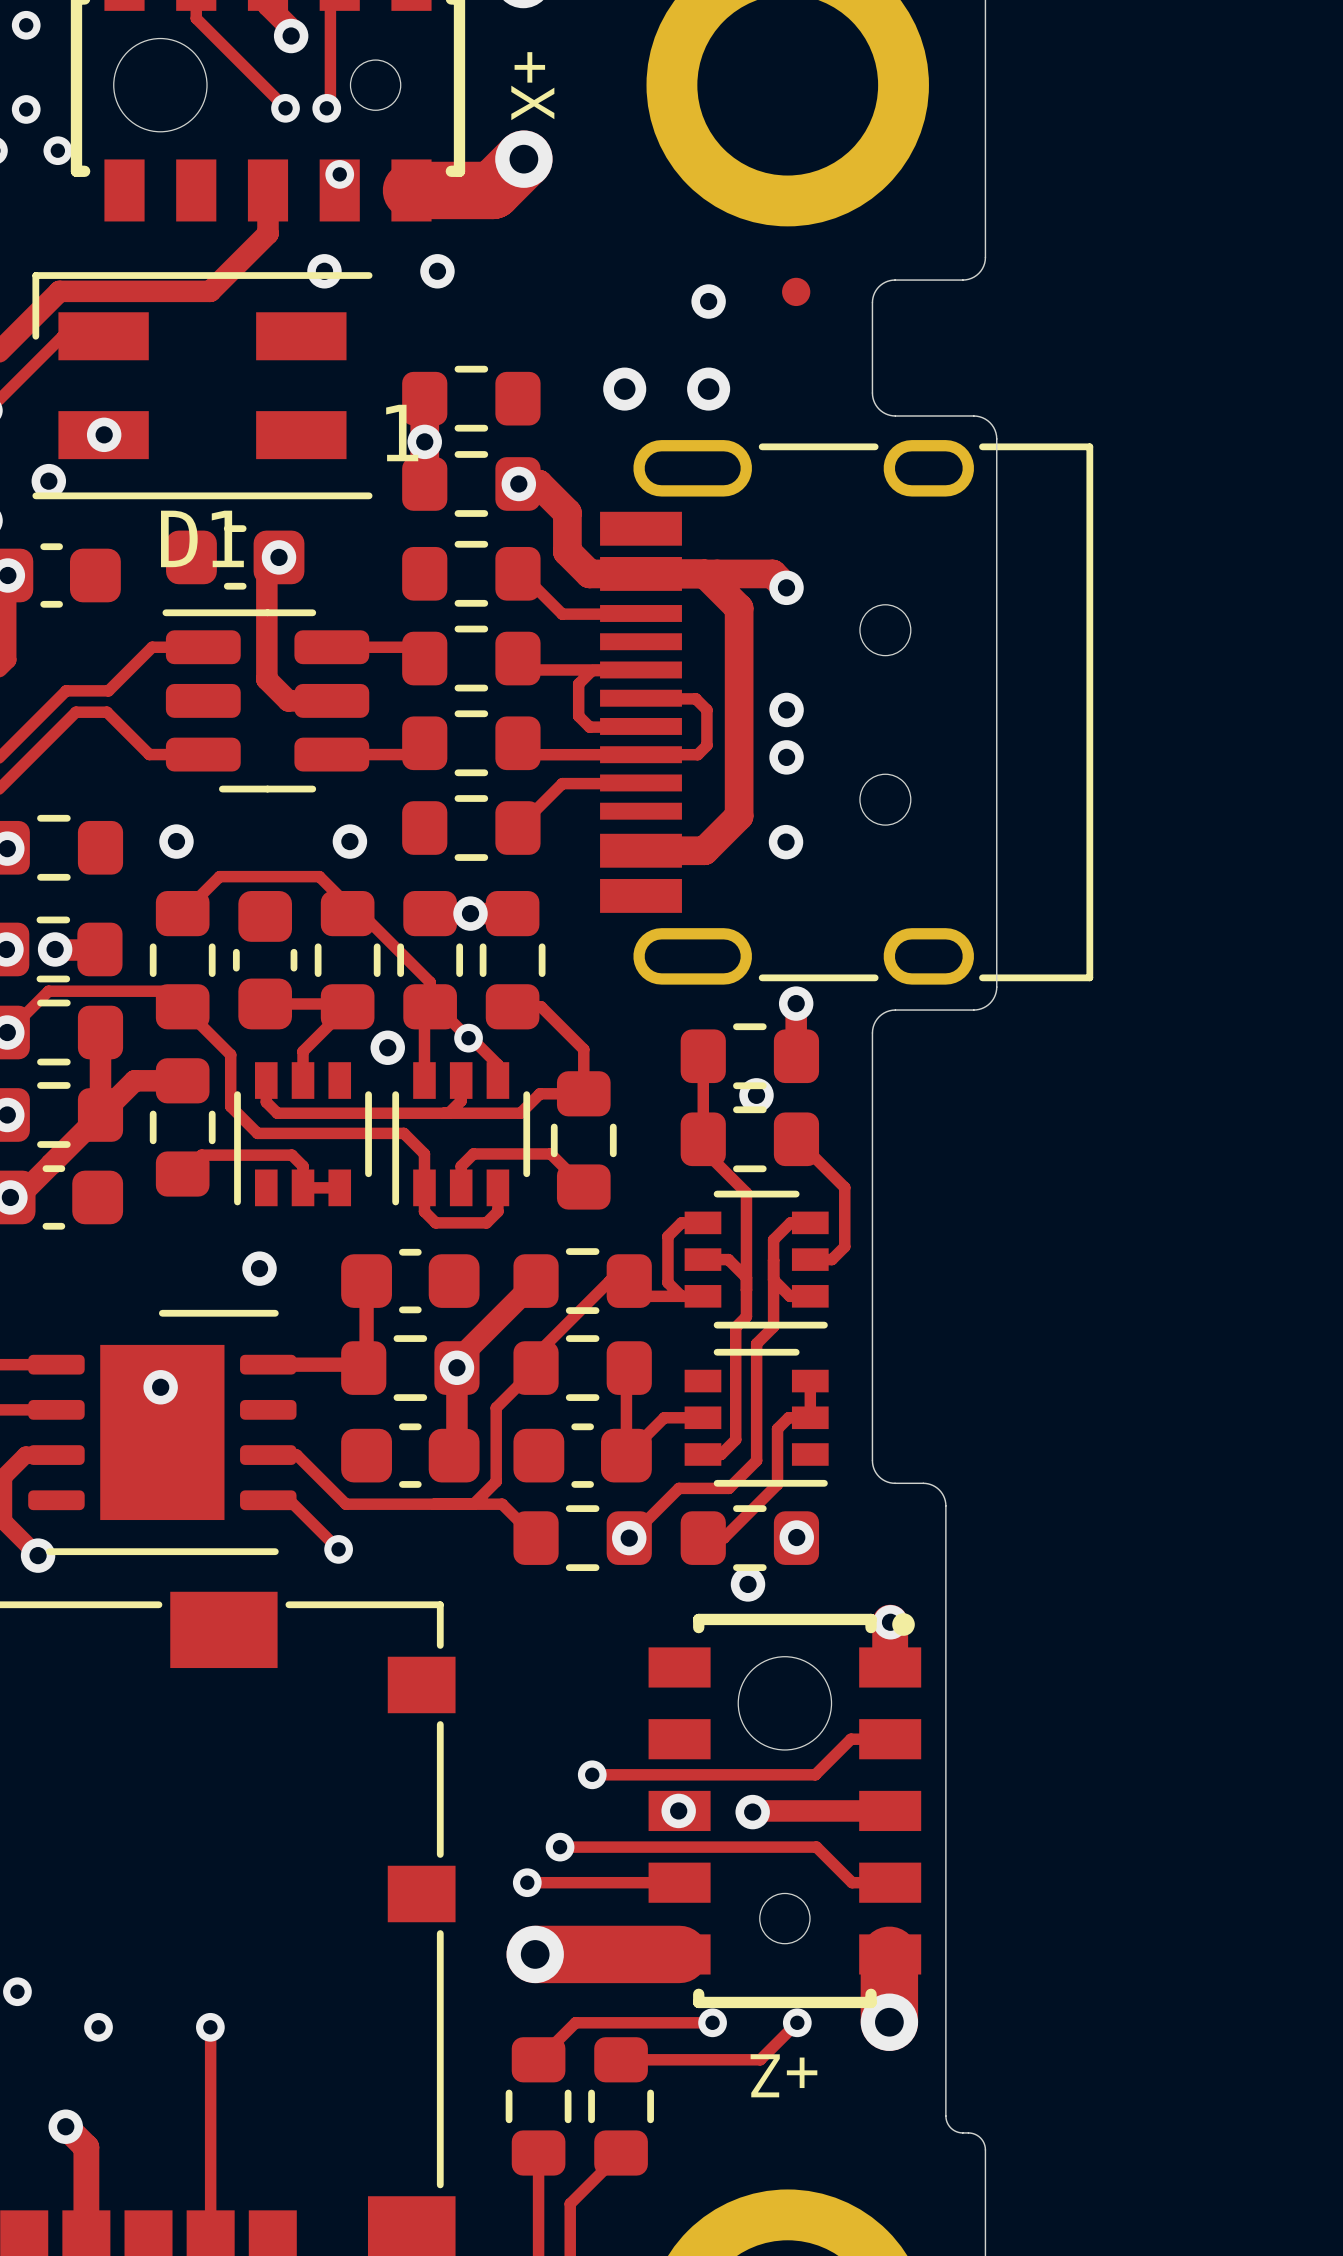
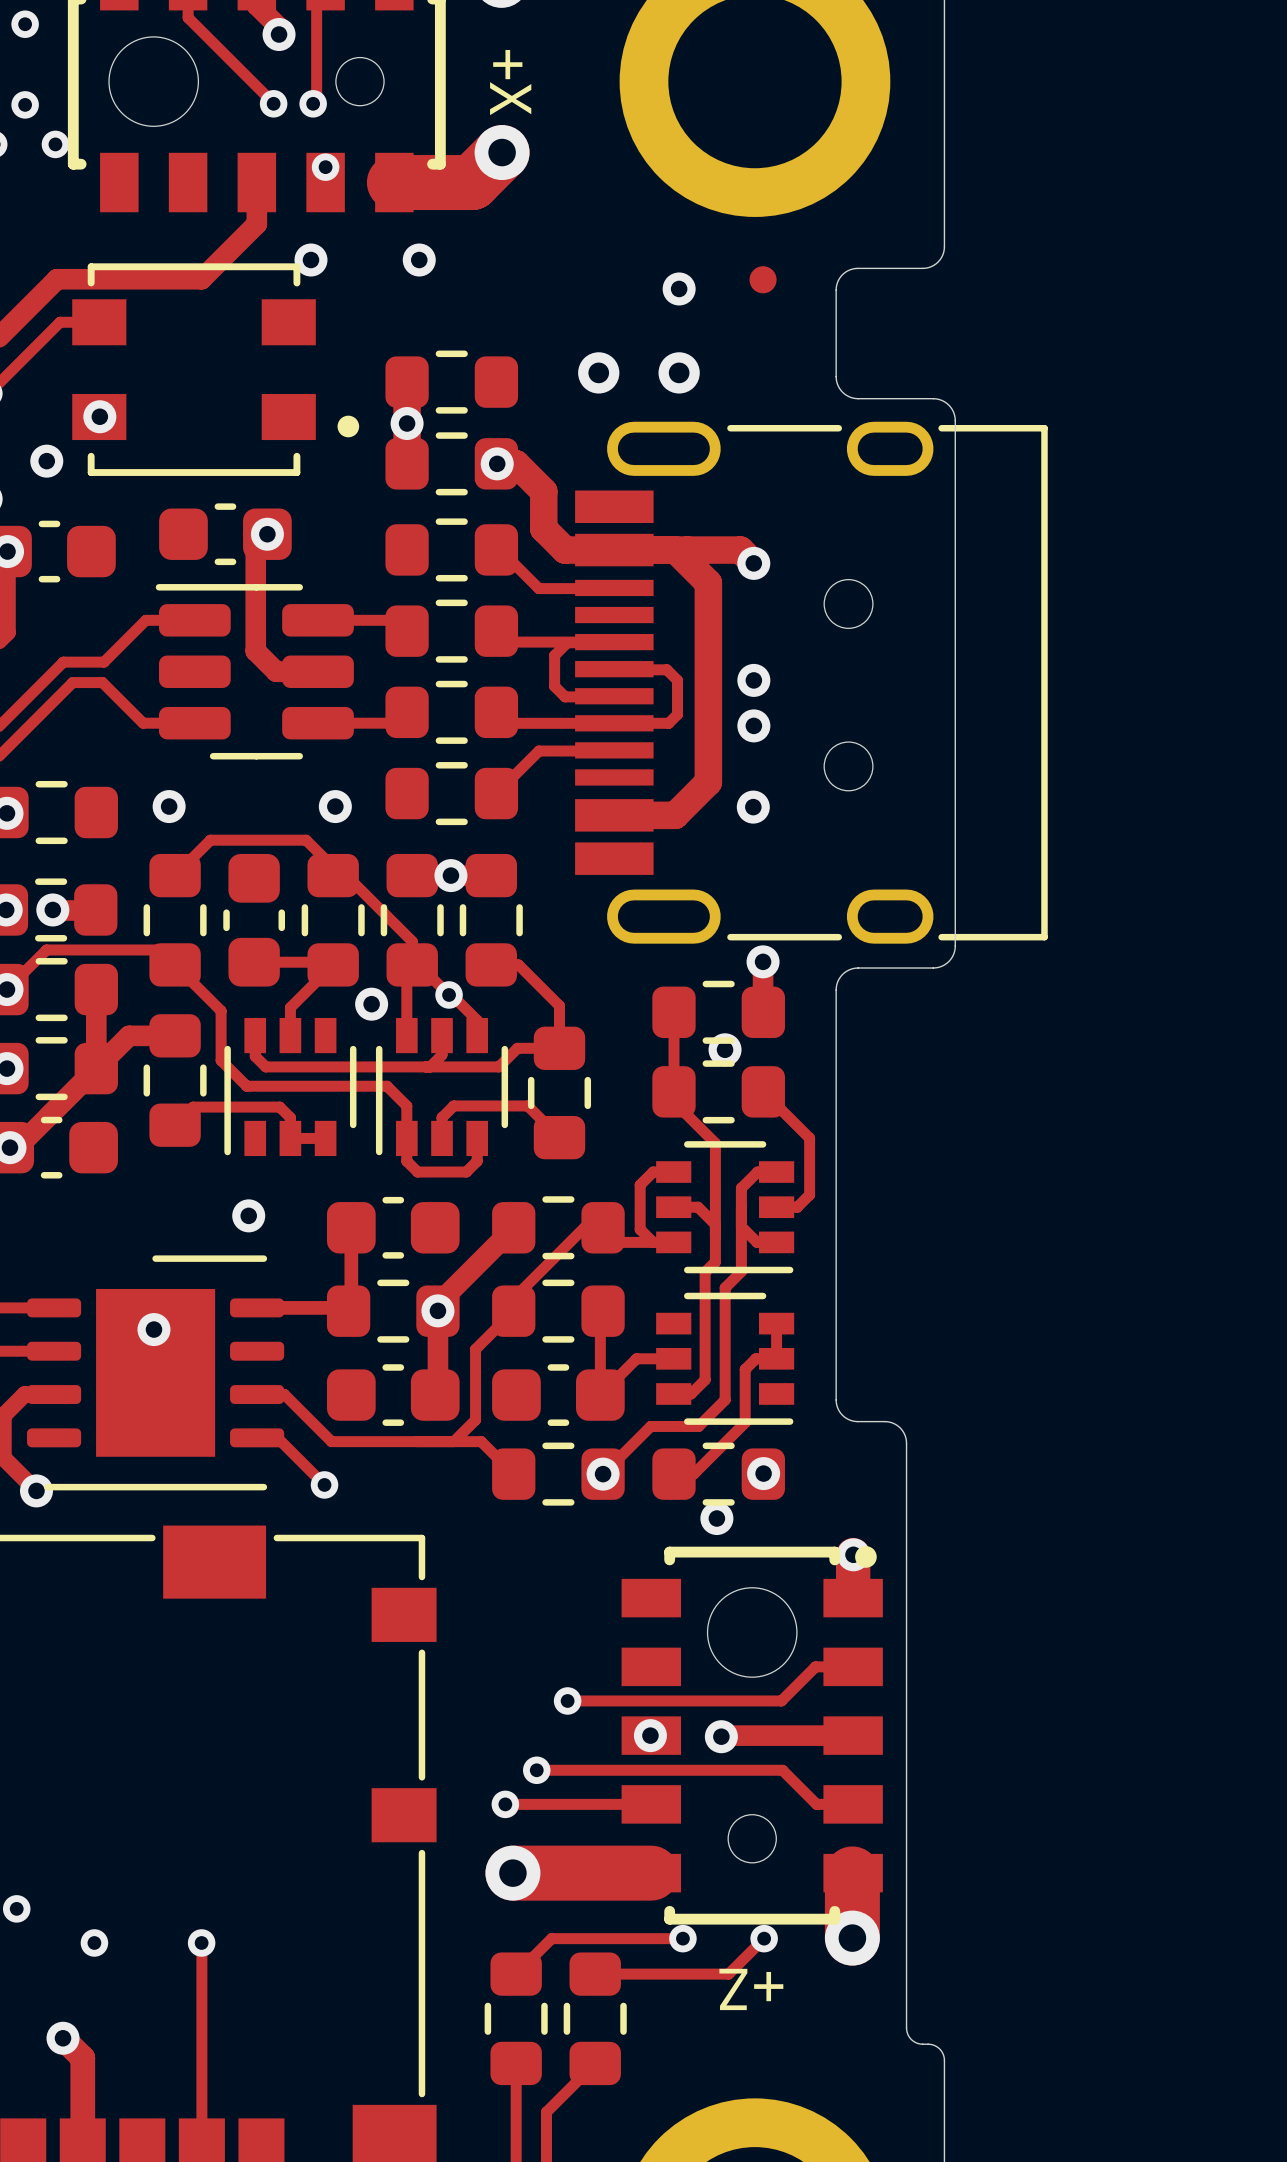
D1: (202, 385) -> none
part: none -> (215, 369)

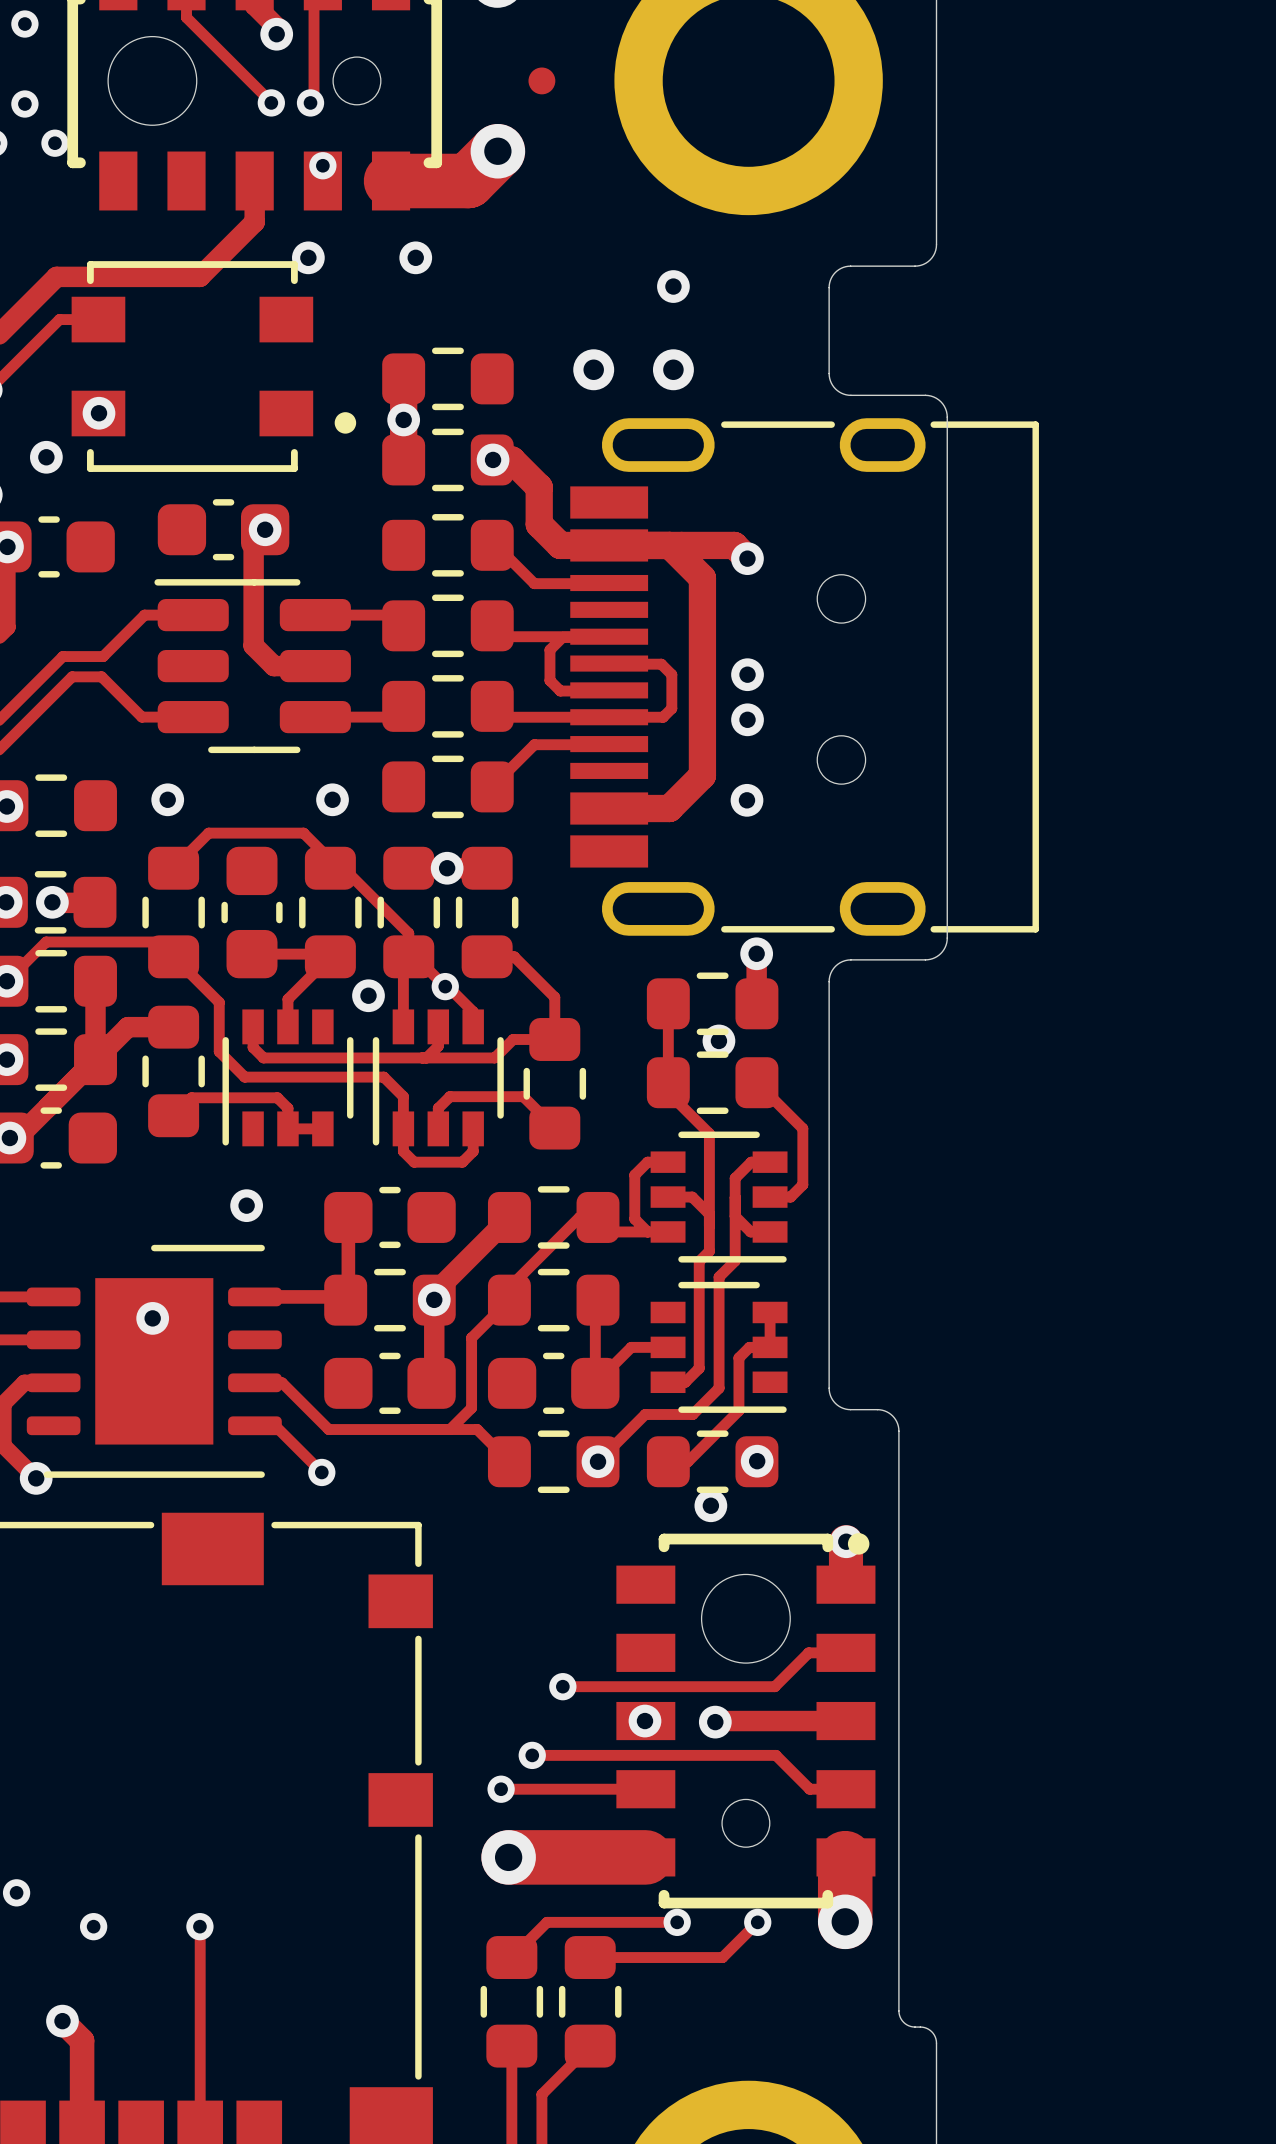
text: +X (510, 82) -> none
part position: (763, 279) -> (541, 80)
text: +Z (751, 1989) -> none

